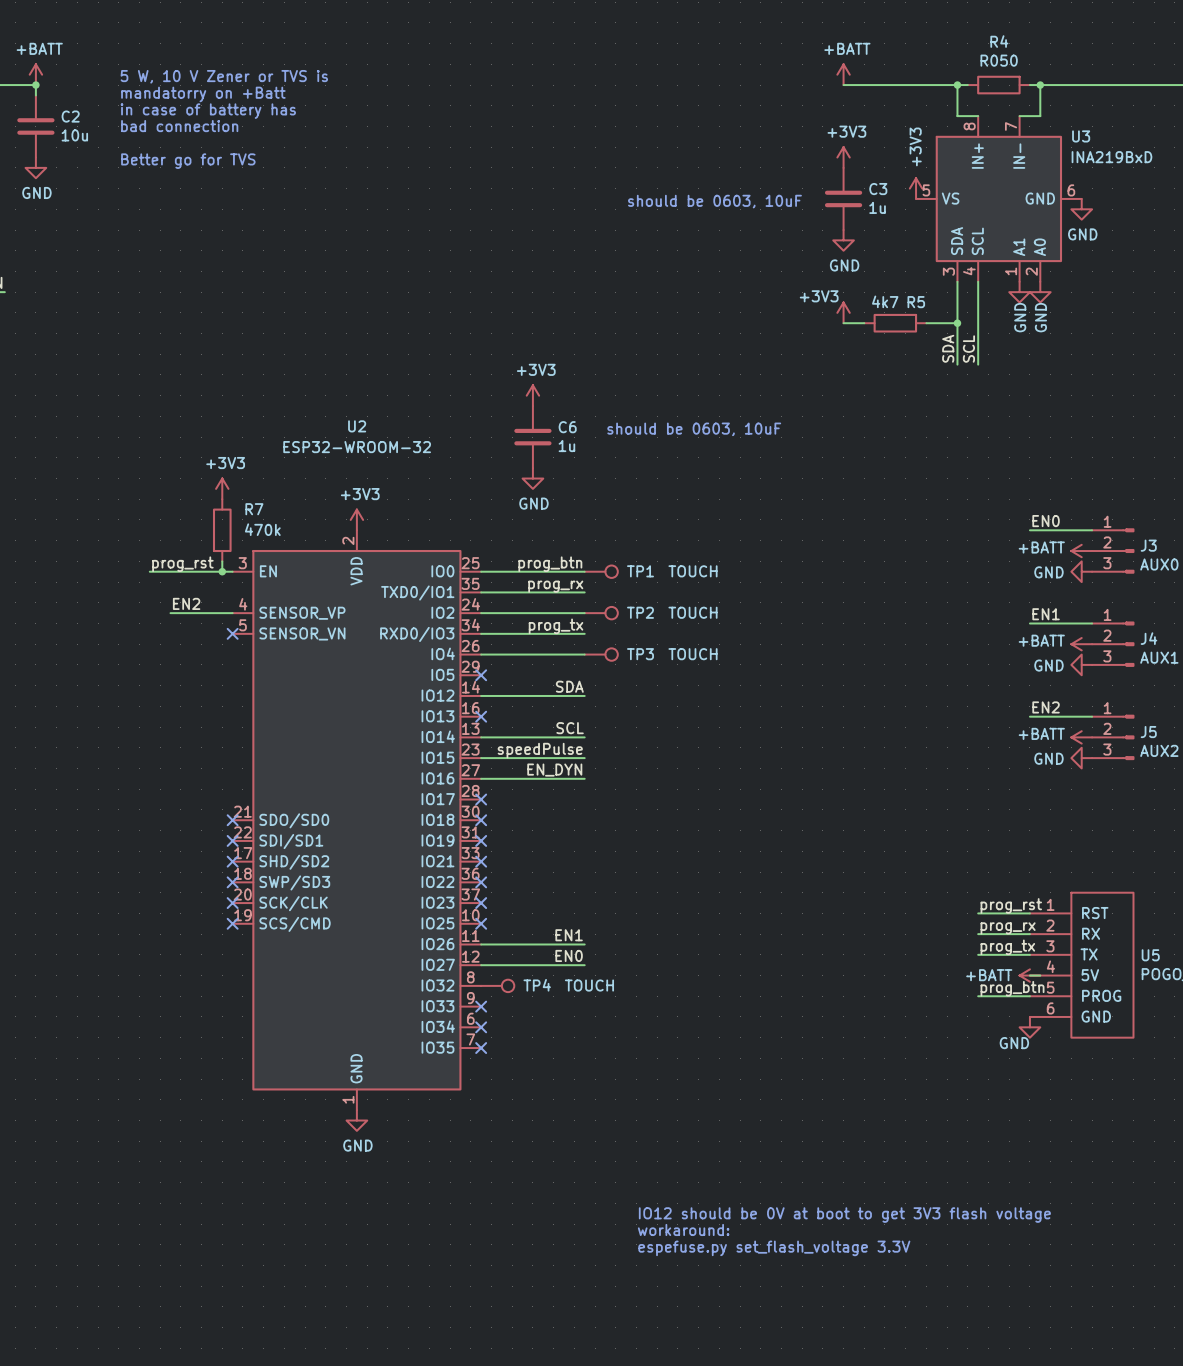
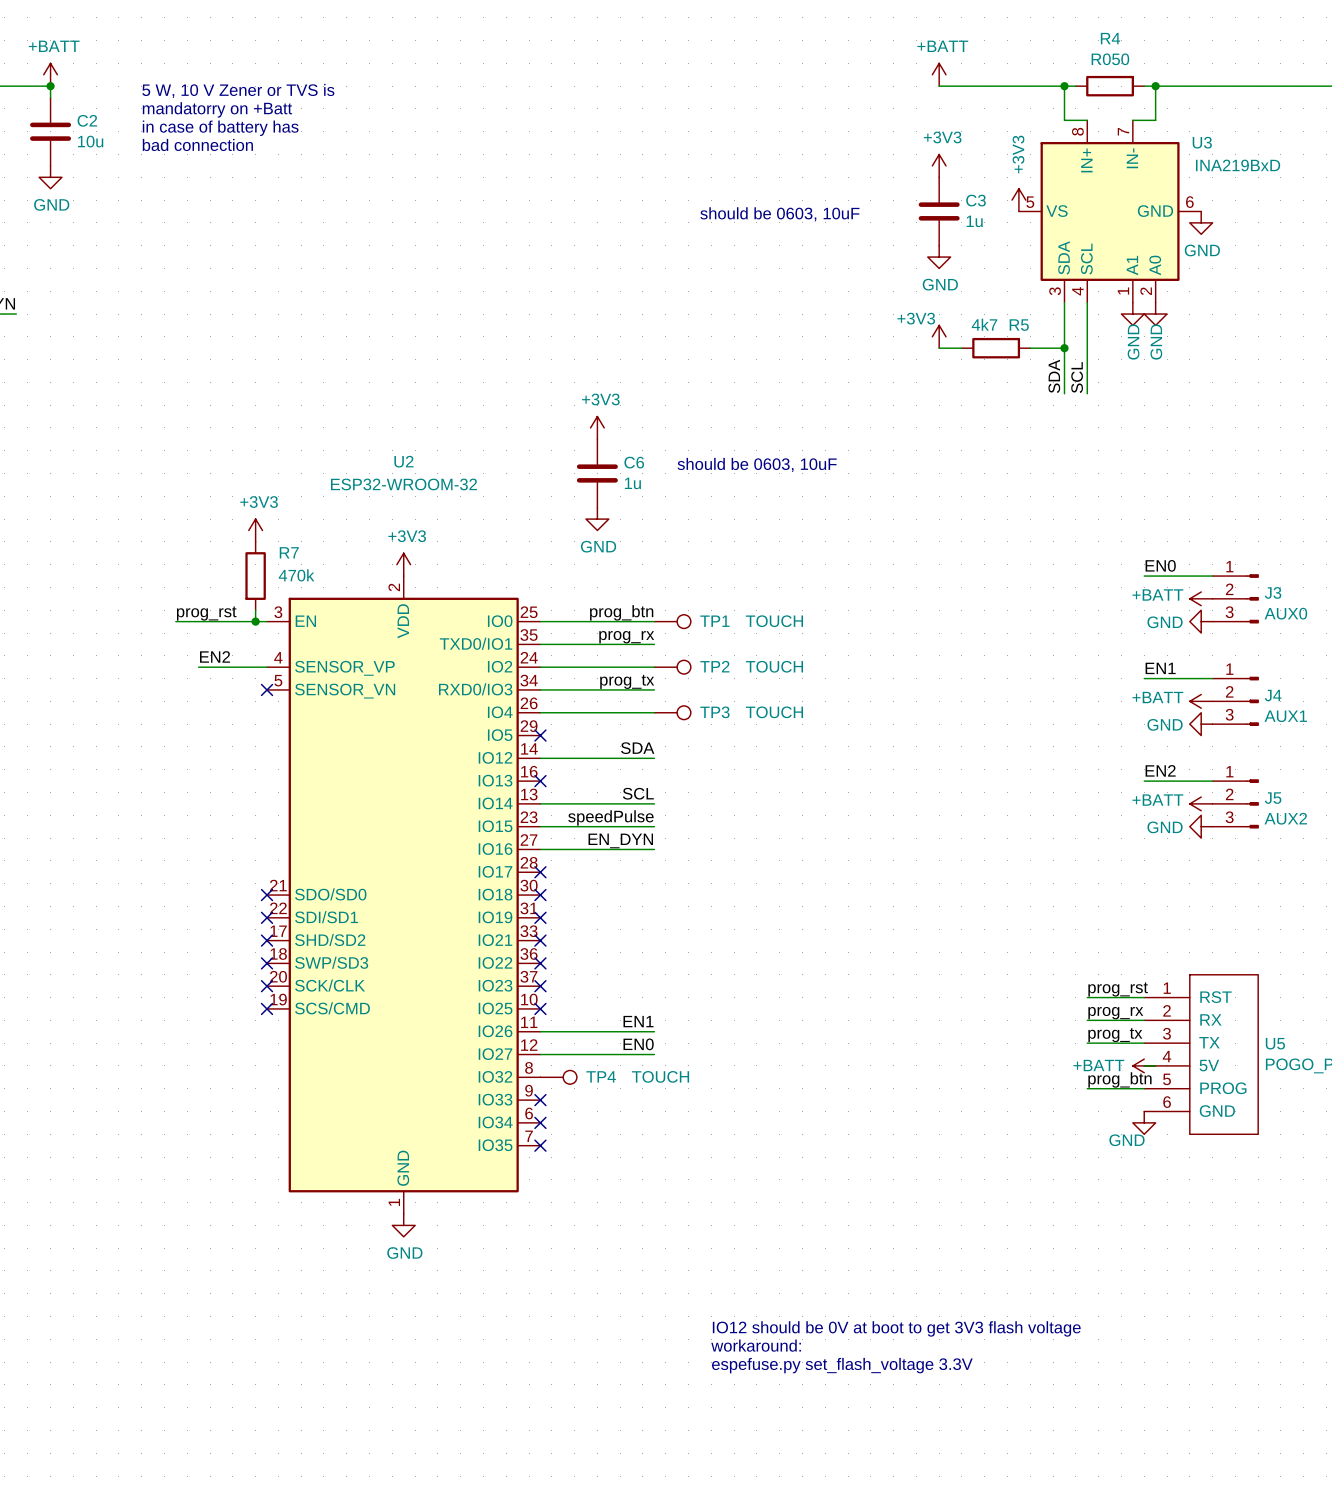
text: 5 W, 10 V Zener or TVS is (224, 76) -> none
text: mandatorry on +Batt (203, 94) -> 5 W, 10 V Zener or TVS is (238, 90)
text: in case of battery has (208, 111) -> mandatorry on +Batt (217, 109)
text: bad connection (179, 126) -> in case of battery has (220, 128)
text: none -> bad connection (197, 144)
text: Better go for TVS (188, 161) -> none

